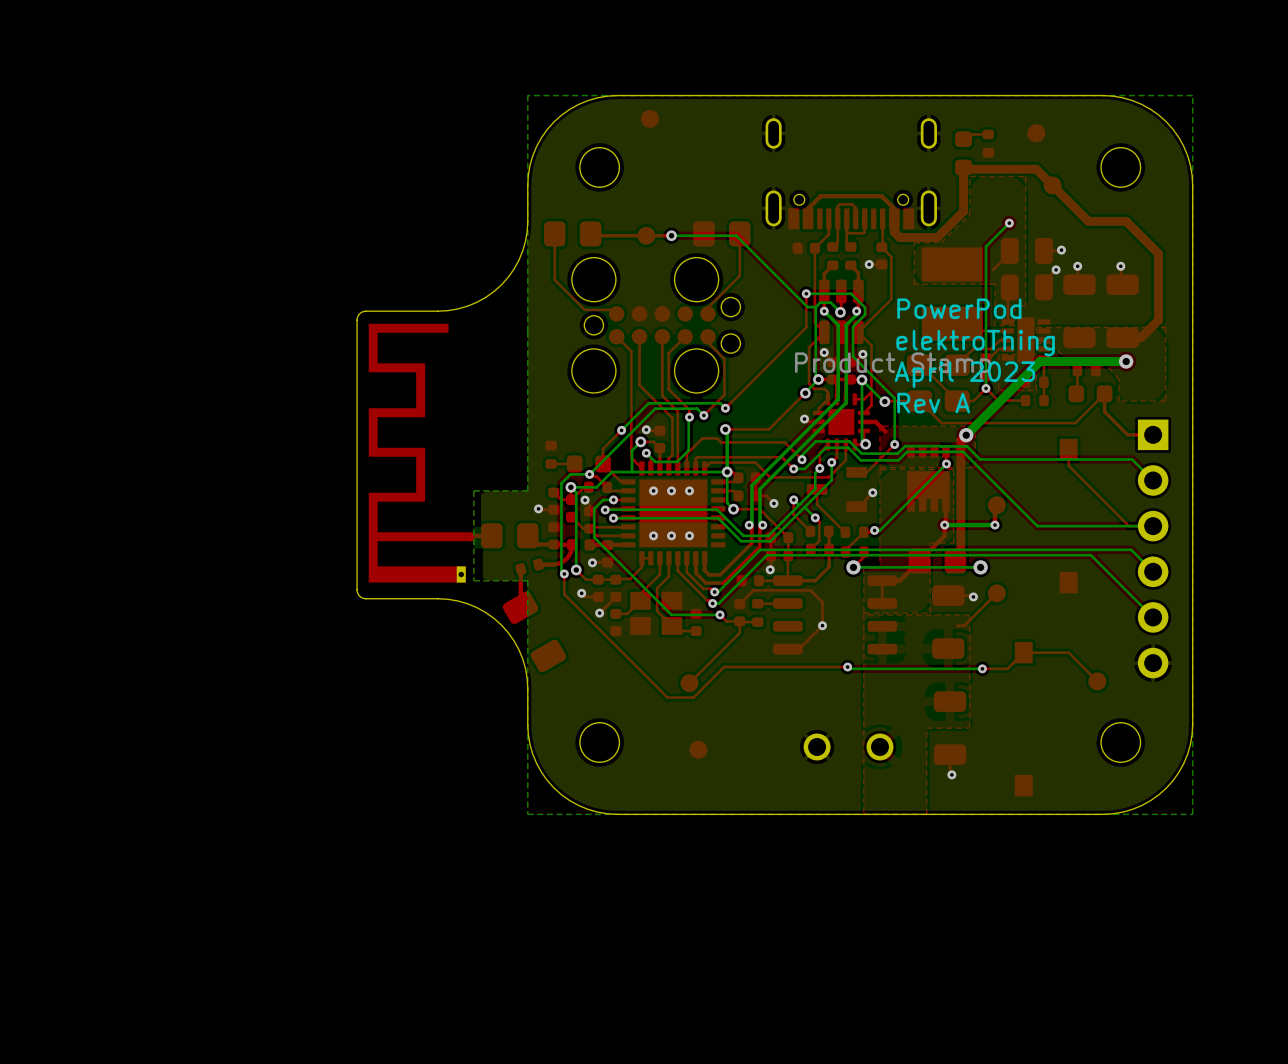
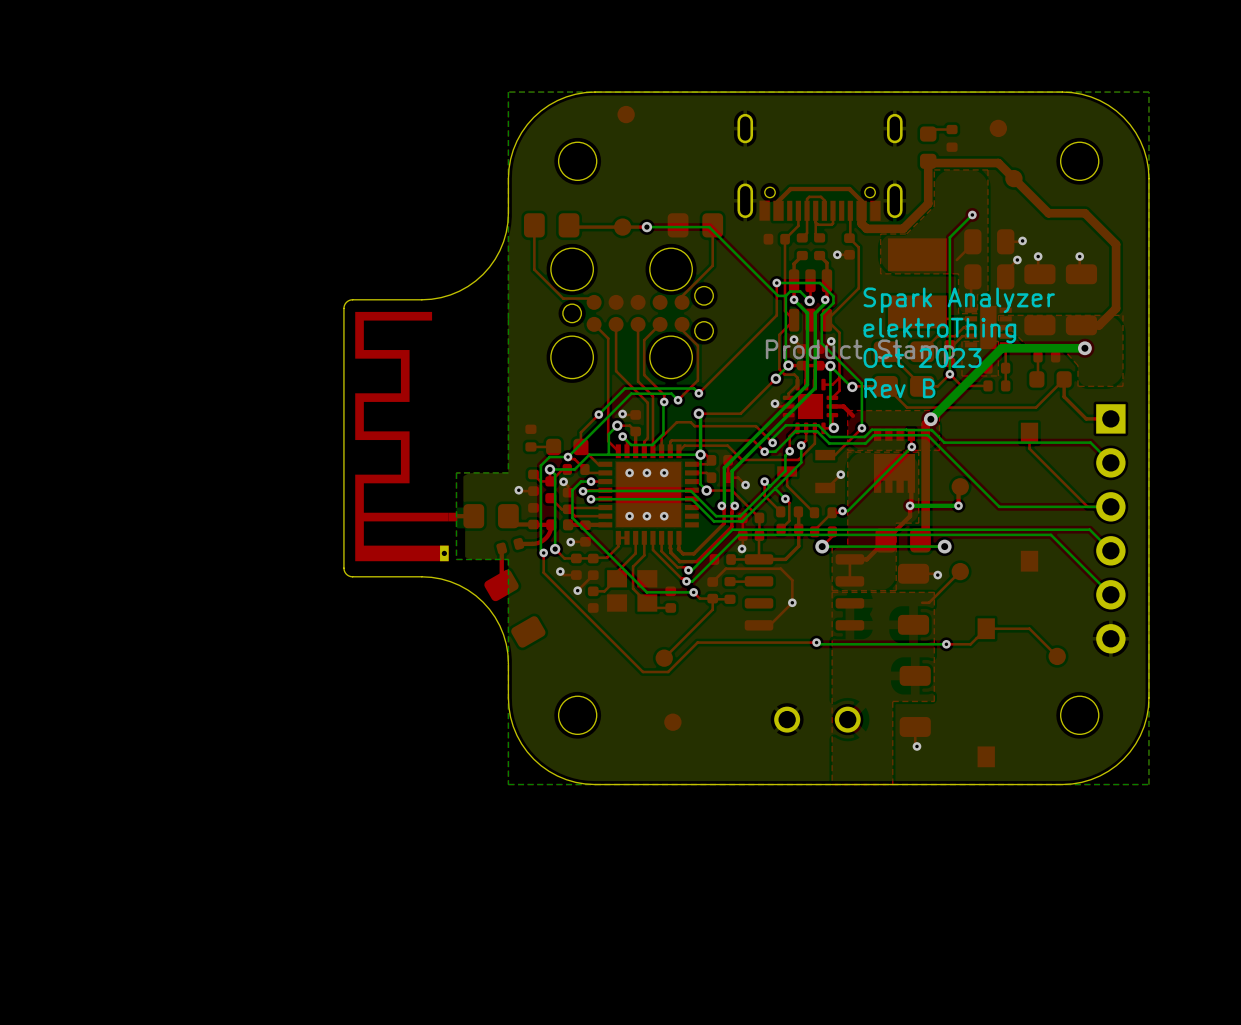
drawing shape: [794, 298, 1055, 414] -> [765, 287, 1055, 399]

